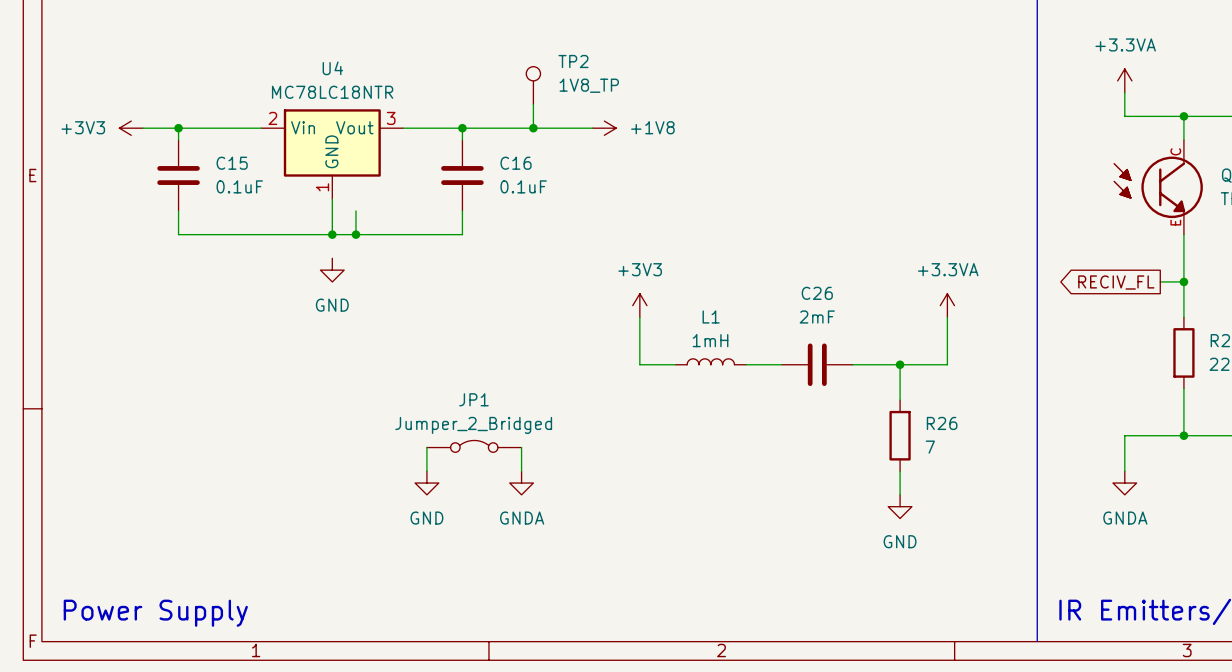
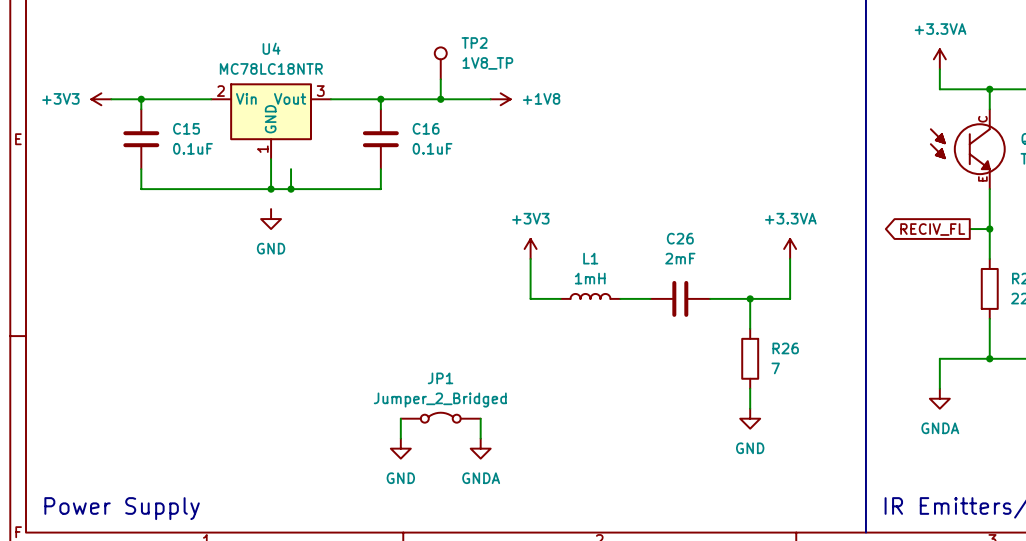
JP1 position: (474, 446) -> (440, 417)
wire: (426, 447) (426, 471) -> (480, 418) (480, 438)
wire: (521, 447) (521, 471) -> (400, 418) (400, 438)
power symbol position: GND (426, 483) -> GND (400, 448)
power symbol position: GNDA (521, 483) -> GNDA (480, 448)

